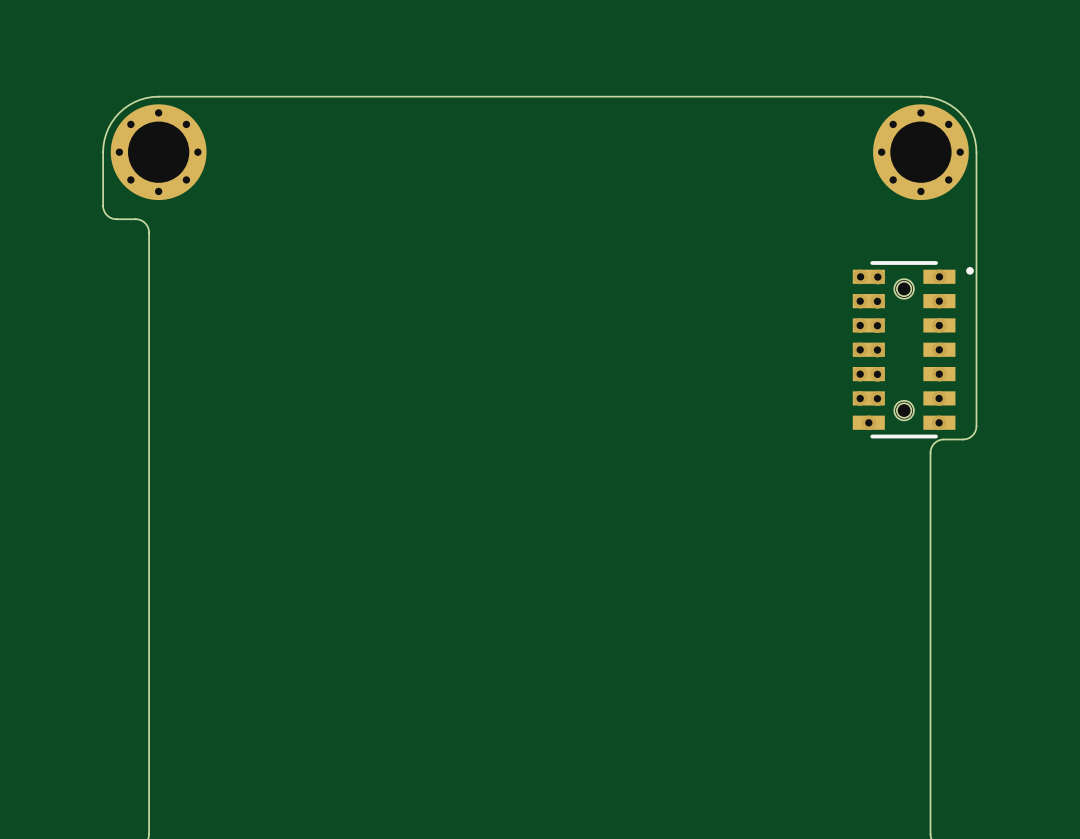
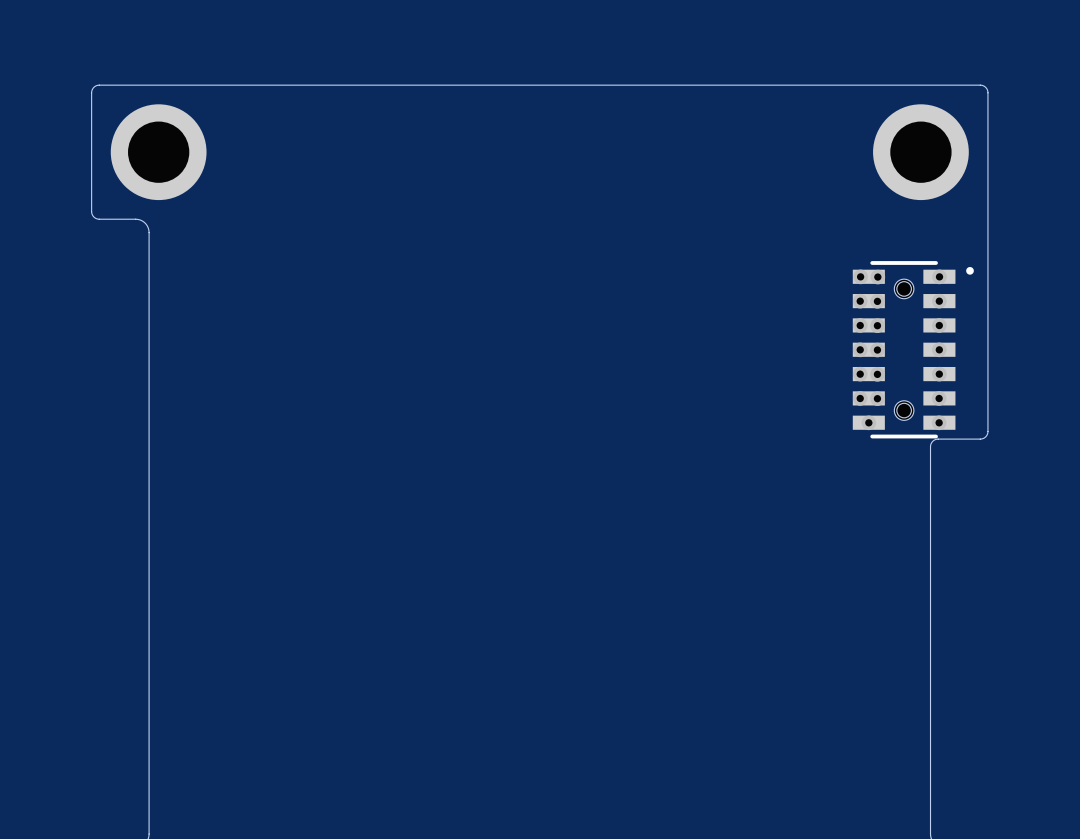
part footprint: [110, 104, 207, 201] -> [110, 104, 207, 201]
part footprint: [873, 104, 969, 201] -> [873, 104, 969, 201]
board edge: (116, 219) (107, 215) (103, 207) (103, 152) (106, 133) (111, 122) (124, 108) (140, 99) (152, 96) (933, 98) (945, 102) (960, 112) (970, 128) (976, 145) (976, 426) (973, 434) (967, 438) (936, 441) (931, 447) (930, 452) -> (116, 219) (97, 218) (91, 212) (91, 92) (93, 88) (98, 85) (982, 85) (986, 88) (987, 92) (987, 432) (985, 436) (981, 439) (935, 439) (930, 444) (930, 452)

